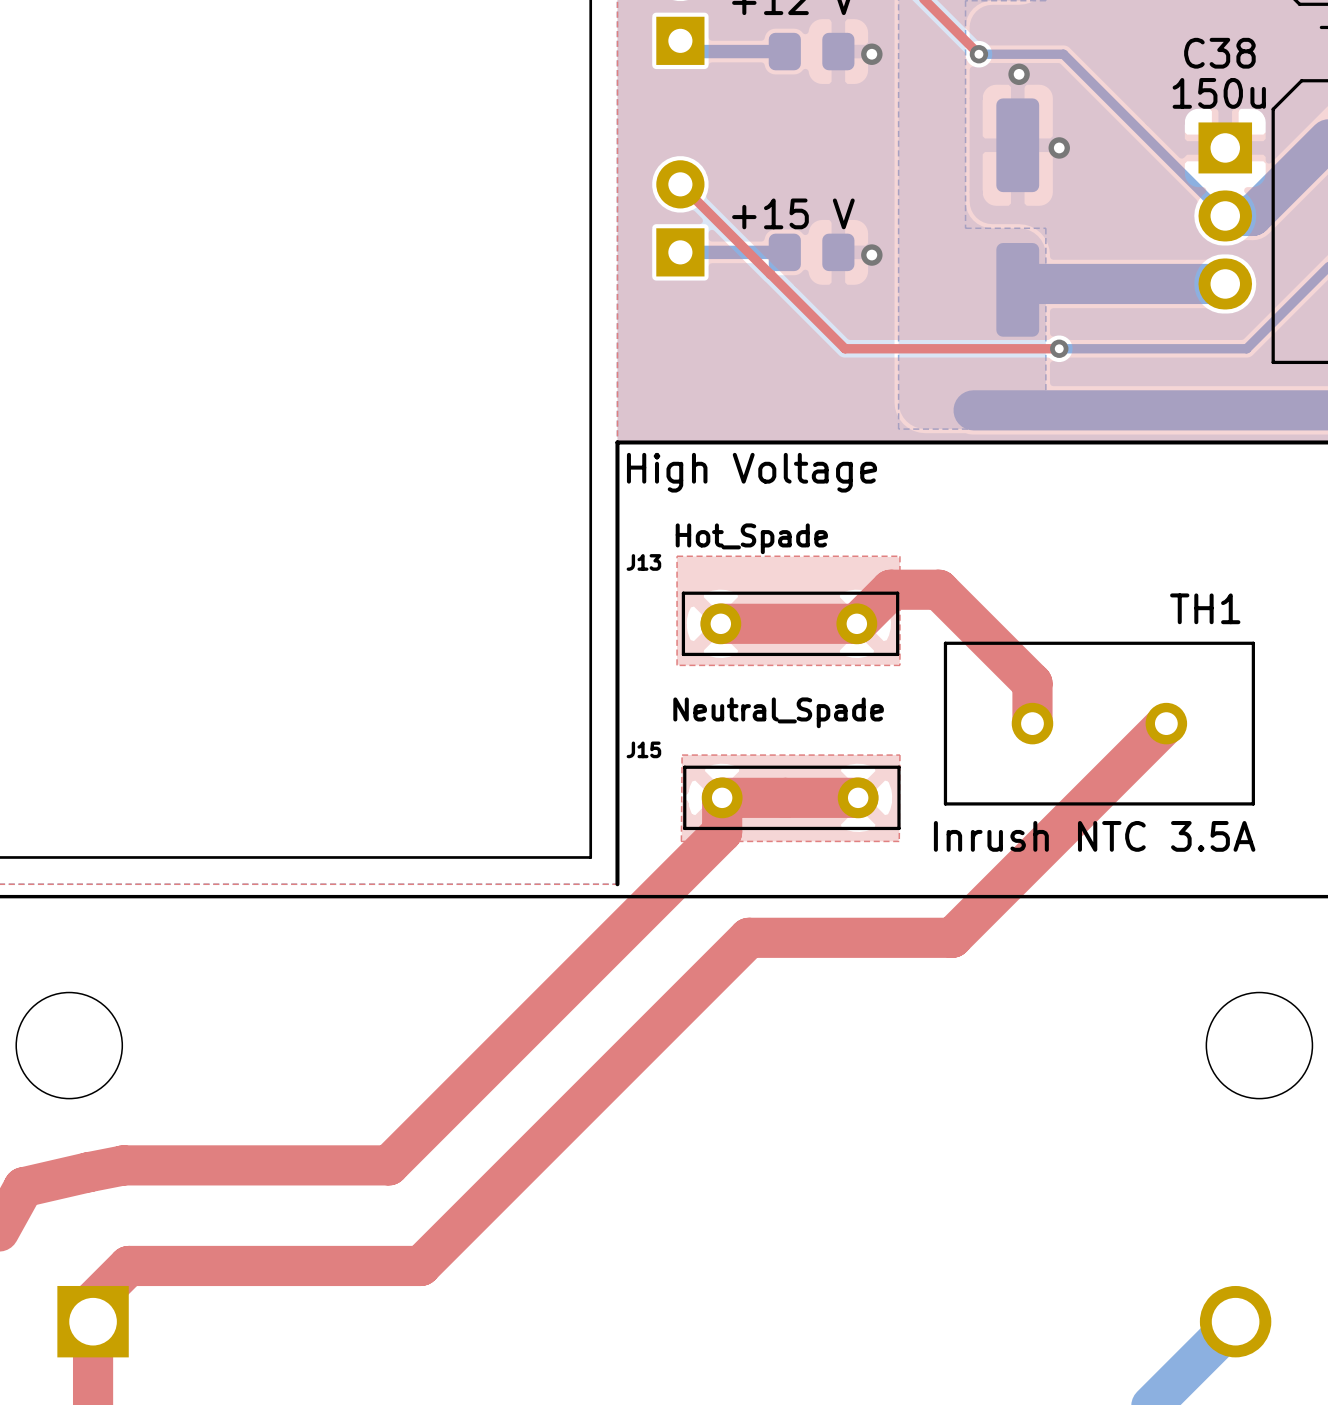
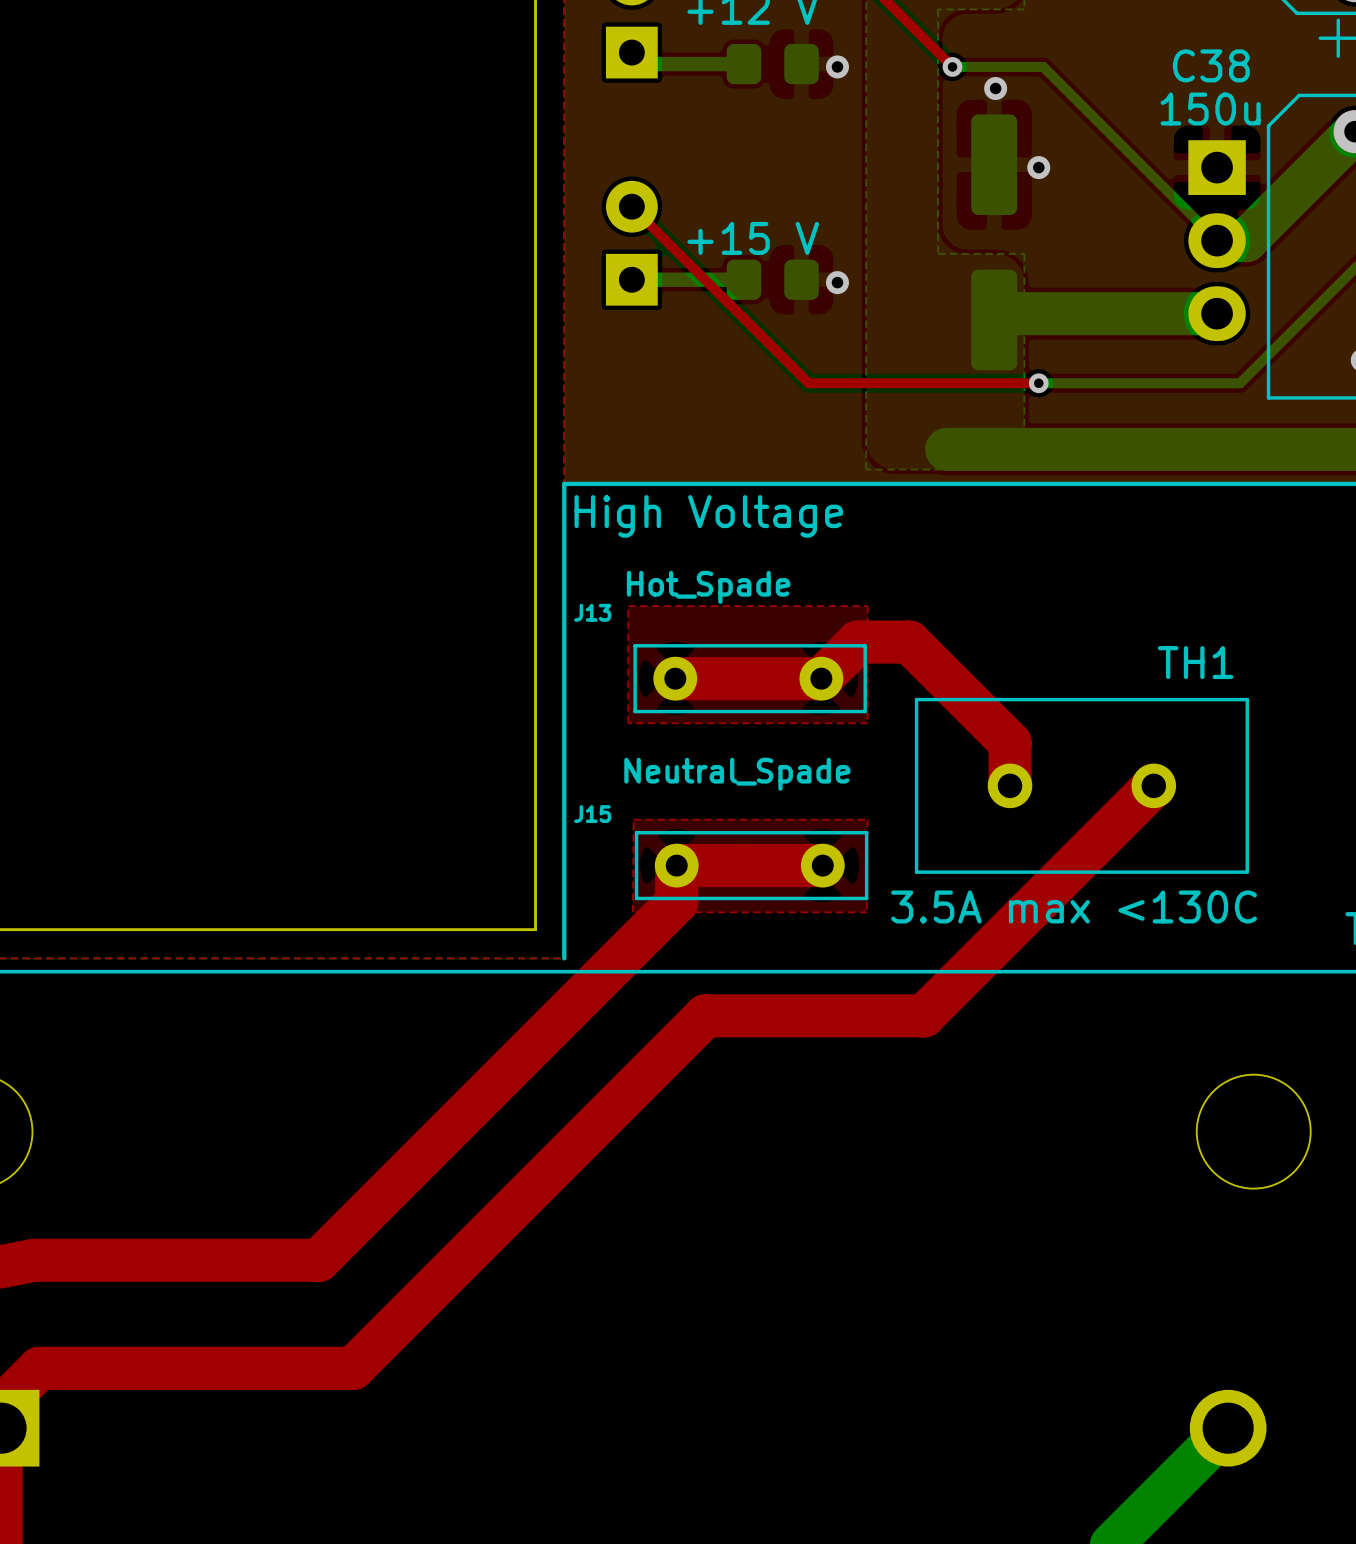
TH1 value: Inrush NTC 3.5A (1094, 836) -> 3.5A max <130C (1074, 906)

